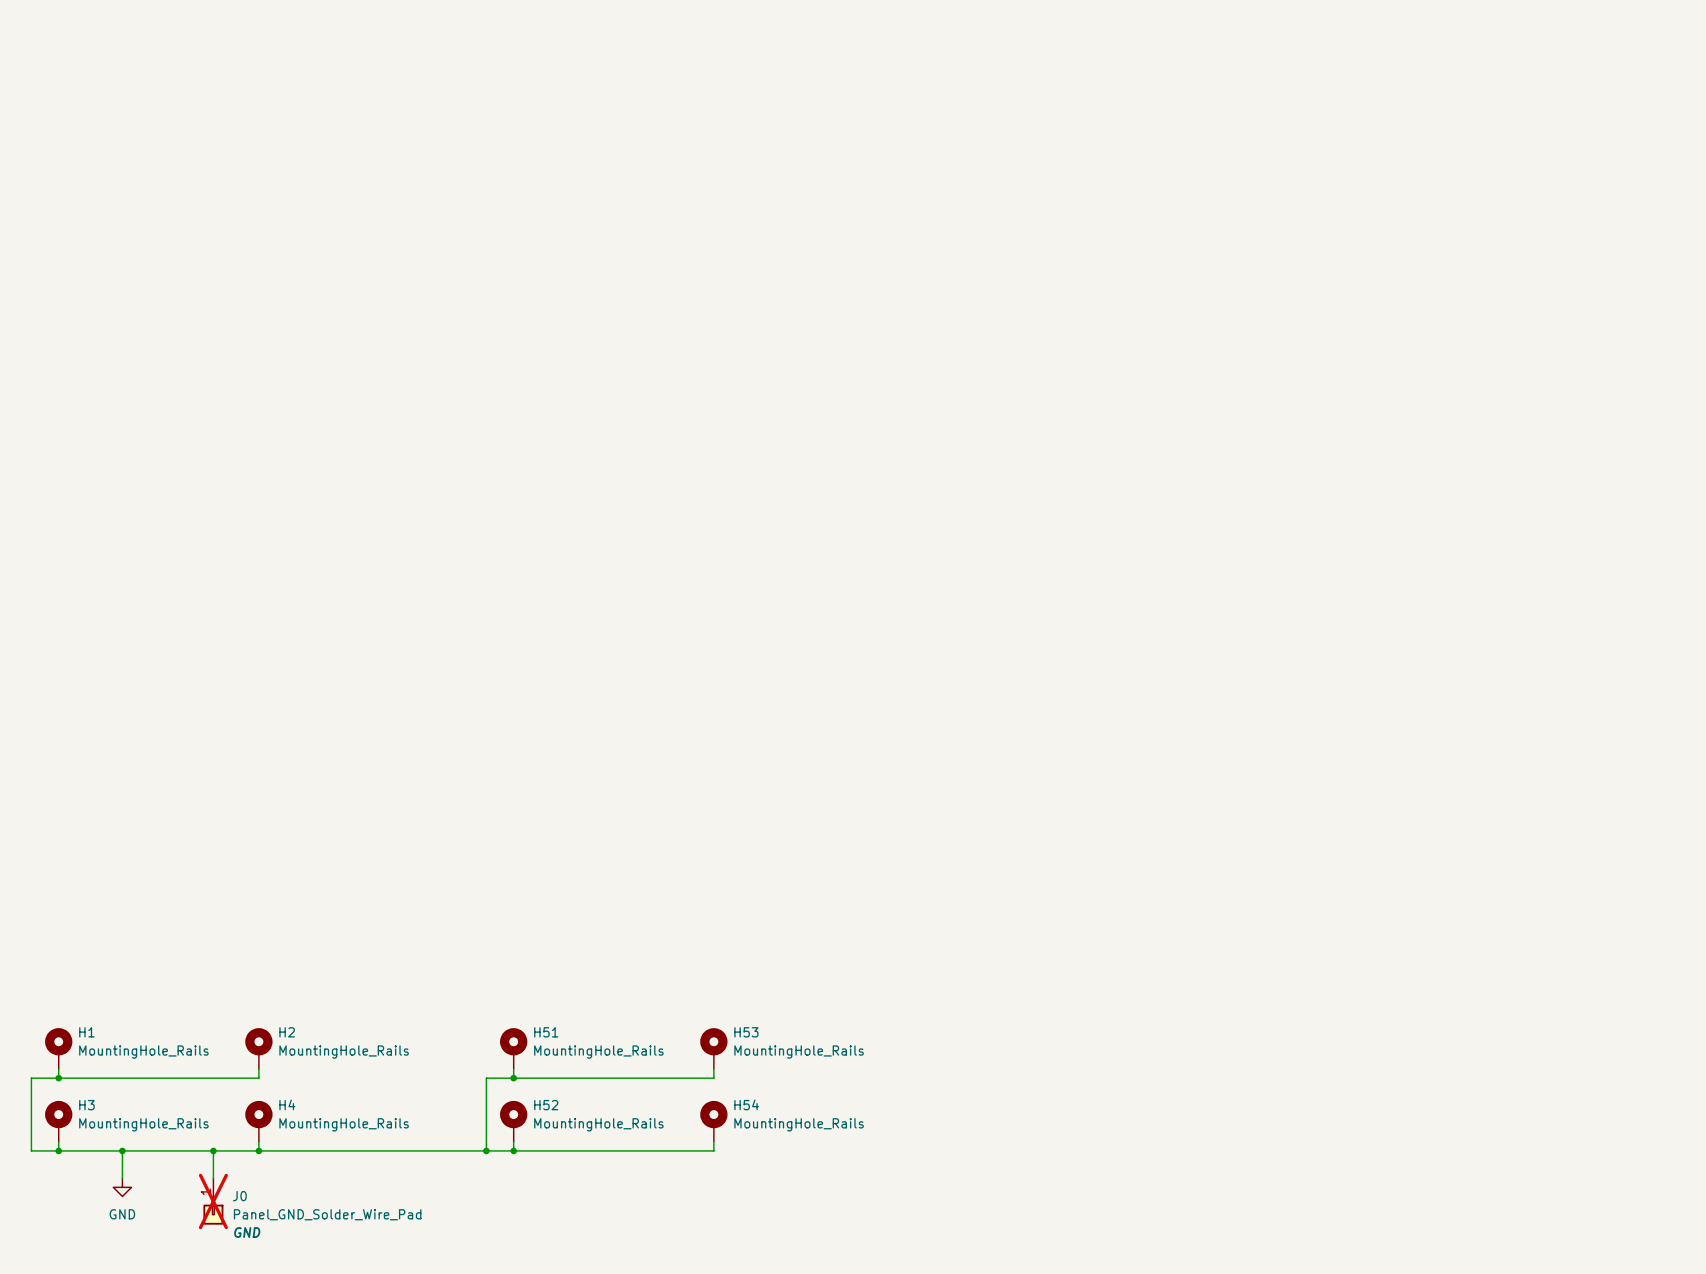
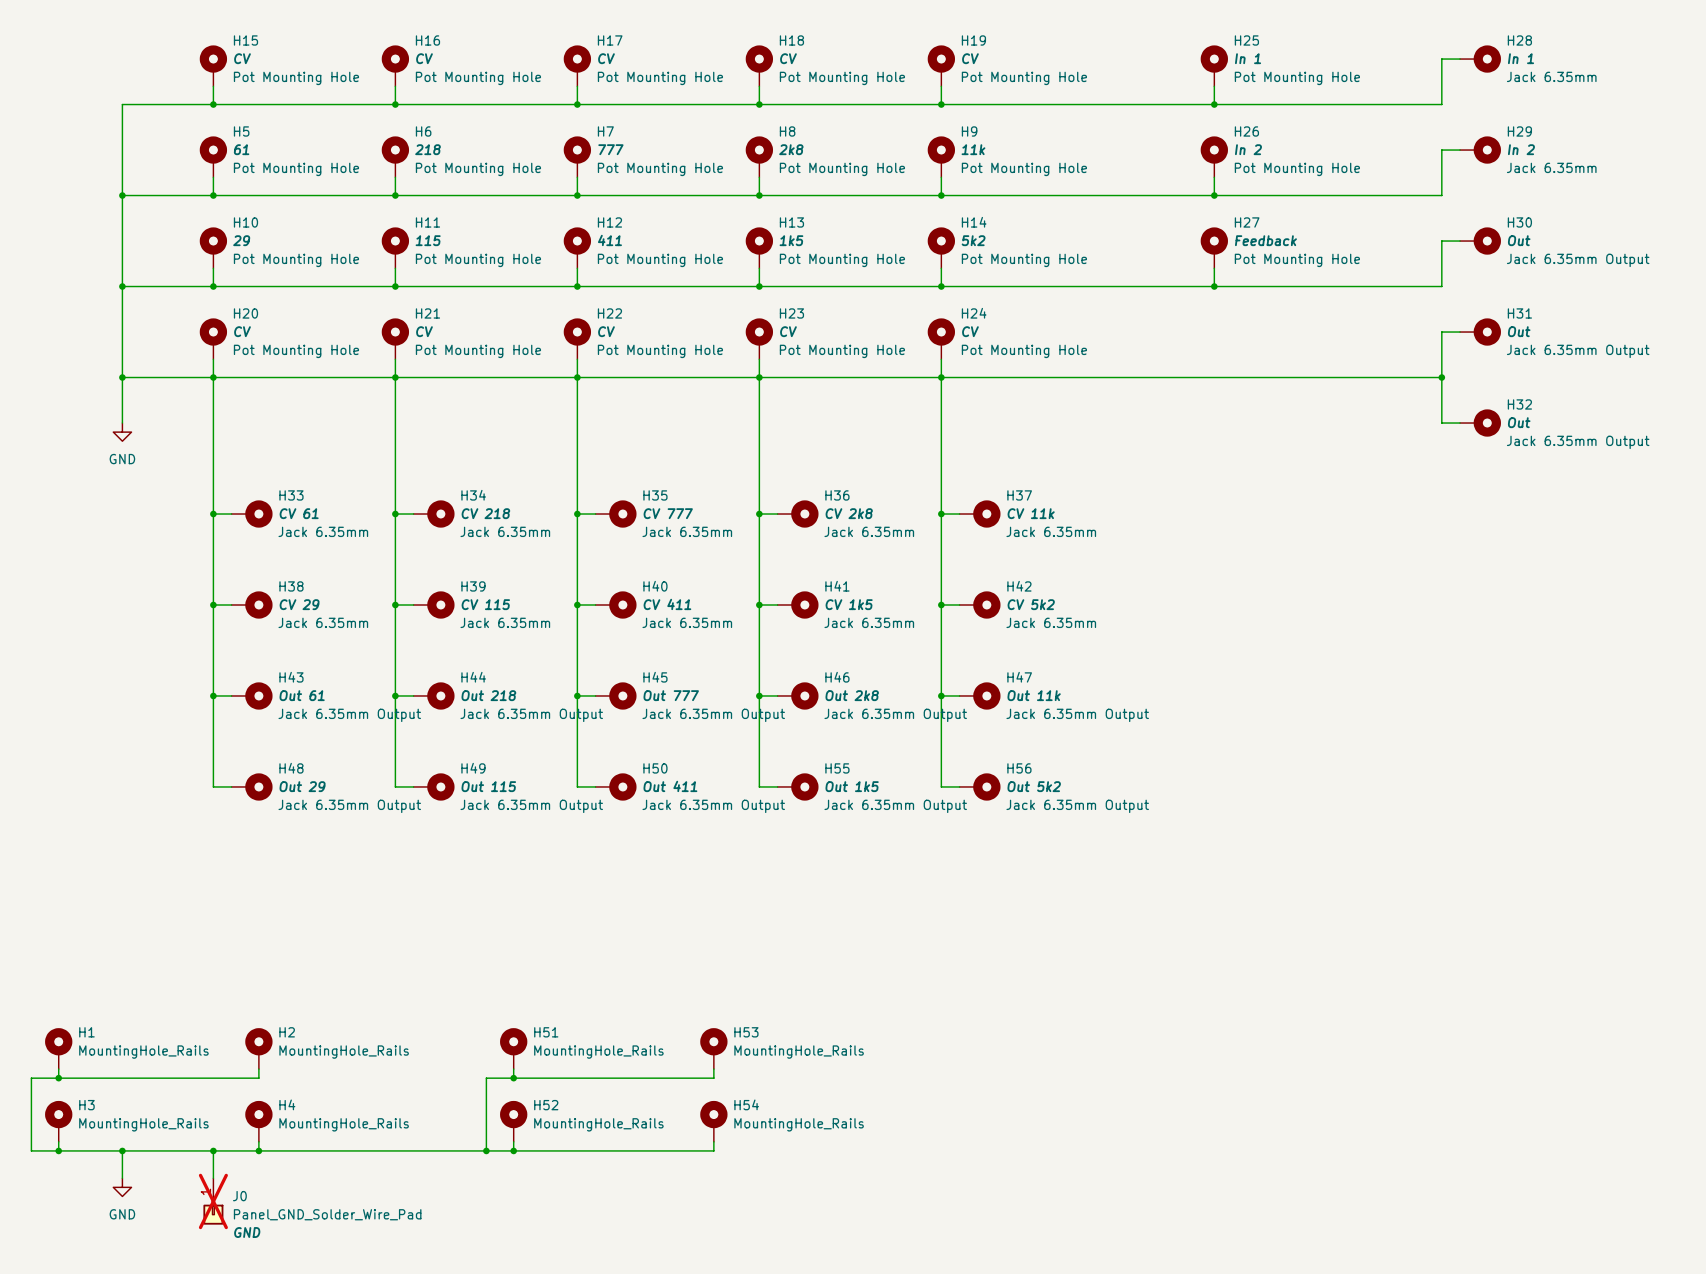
wire: none -> (1460, 59) (1441, 59) (1441, 104) (122, 104) (122, 423)
H28: none -> In 1 (1480, 59)
H15: none -> CV (213, 65)
H16: none -> CV (395, 65)
H17: none -> CV (577, 65)
H18: none -> CV (759, 65)
H19: none -> CV (941, 65)
H25: none -> In 1 (1214, 65)
wire: none -> (213, 86) (213, 104)
wire: none -> (395, 86) (395, 104)
wire: none -> (577, 86) (577, 104)
wire: none -> (759, 86) (759, 104)
wire: none -> (941, 86) (941, 104)
wire: none -> (1214, 86) (1214, 104)
junction: none -> (213, 104)
junction: none -> (395, 104)
junction: none -> (577, 104)
junction: none -> (759, 104)
junction: none -> (941, 104)
junction: none -> (1214, 104)
wire: none -> (1460, 150) (1441, 150) (1441, 195) (122, 195)
H29: none -> In 2 (1480, 150)
H5: none -> 61 (213, 156)
H6: none -> 218 (395, 156)
H7: none -> 777 (577, 156)
H8: none -> 2k8 (759, 156)
H9: none -> 11k (941, 156)
H26: none -> In 2 (1214, 156)
wire: none -> (213, 177) (213, 195)
wire: none -> (395, 177) (395, 195)
wire: none -> (577, 177) (577, 195)
wire: none -> (759, 177) (759, 195)
wire: none -> (941, 177) (941, 195)
wire: none -> (1214, 177) (1214, 195)
junction: none -> (122, 195)
junction: none -> (213, 195)
junction: none -> (395, 195)
junction: none -> (577, 195)
junction: none -> (759, 195)
junction: none -> (941, 195)
junction: none -> (1214, 195)
wire: none -> (1460, 241) (1441, 241) (1441, 286) (122, 286)
H30: none -> Out (1480, 241)
H10: none -> 29 (213, 247)
H11: none -> 115 (395, 247)
H12: none -> 411 (577, 247)
H13: none -> 1k5 (759, 247)
H14: none -> 5k2 (941, 247)
H27: none -> Feedback (1214, 247)
wire: none -> (213, 268) (213, 286)
wire: none -> (395, 268) (395, 286)
wire: none -> (577, 268) (577, 286)
wire: none -> (759, 268) (759, 286)
wire: none -> (941, 268) (941, 286)
wire: none -> (1214, 268) (1214, 286)
junction: none -> (122, 286)
junction: none -> (213, 286)
junction: none -> (395, 286)
junction: none -> (577, 286)
junction: none -> (759, 286)
junction: none -> (941, 286)
junction: none -> (1214, 286)
wire: none -> (1460, 332) (1441, 332) (1441, 423) (1460, 423)
H31: none -> Out (1480, 332)
H20: none -> CV (213, 338)
H21: none -> CV (395, 338)
H22: none -> CV (577, 338)
H23: none -> CV (759, 338)
H24: none -> CV (941, 338)
wire: none -> (213, 359) (213, 786) (231, 786)
wire: none -> (395, 359) (395, 786) (413, 786)
wire: none -> (577, 359) (577, 786) (595, 786)
wire: none -> (759, 359) (759, 786) (777, 786)
wire: none -> (941, 359) (941, 786) (959, 786)
wire: none -> (122, 377) (1441, 377)
junction: none -> (122, 377)
junction: none -> (213, 377)
junction: none -> (395, 377)
junction: none -> (577, 377)
junction: none -> (759, 377)
junction: none -> (941, 377)
junction: none -> (1441, 377)
H32: none -> Out (1480, 423)
power symbol: none -> GND (122, 432)
wire: none -> (213, 514) (231, 514)
junction: none -> (213, 514)
H33: none -> CV 61 (252, 514)
wire: none -> (395, 514) (413, 514)
junction: none -> (395, 514)
H34: none -> CV 218 (434, 514)
wire: none -> (577, 514) (595, 514)
junction: none -> (577, 514)
H35: none -> CV 777 (616, 514)
wire: none -> (759, 514) (777, 514)
junction: none -> (759, 514)
H36: none -> CV 2k8 (798, 514)
wire: none -> (941, 514) (959, 514)
junction: none -> (941, 514)
H37: none -> CV 11k (980, 514)
wire: none -> (213, 605) (231, 605)
junction: none -> (213, 605)
H38: none -> CV 29 (252, 605)
wire: none -> (395, 605) (413, 605)
junction: none -> (395, 605)
H39: none -> CV 115 (434, 605)
wire: none -> (577, 605) (595, 605)
junction: none -> (577, 605)
H40: none -> CV 411 (616, 605)
wire: none -> (759, 605) (777, 605)
junction: none -> (759, 605)
H41: none -> CV 1k5 (798, 605)
wire: none -> (941, 605) (959, 605)
junction: none -> (941, 605)
H42: none -> CV 5k2 (980, 605)
wire: none -> (213, 695) (231, 695)
junction: none -> (213, 695)
H43: none -> Out 61 (252, 695)
wire: none -> (395, 695) (413, 695)
junction: none -> (395, 695)
H44: none -> Out 218 (434, 695)
wire: none -> (577, 695) (595, 695)
junction: none -> (577, 695)
H45: none -> Out 777 (616, 695)
wire: none -> (759, 695) (777, 695)
junction: none -> (759, 695)
H46: none -> Out 2k8 (798, 695)
wire: none -> (941, 695) (959, 695)
junction: none -> (941, 695)
H47: none -> Out 11k (980, 695)
H48: none -> Out 29 (252, 786)
H49: none -> Out 115 (434, 786)
H50: none -> Out 411 (616, 786)
H55: none -> Out 1k5 (798, 786)
H56: none -> Out 5k2 (980, 786)

